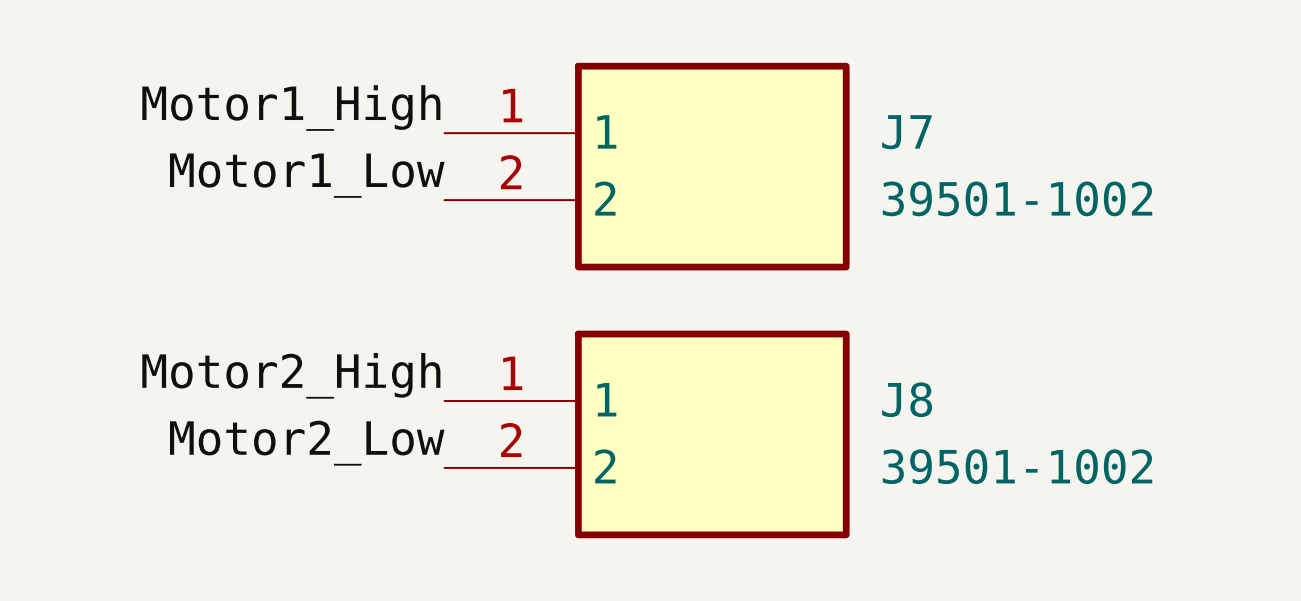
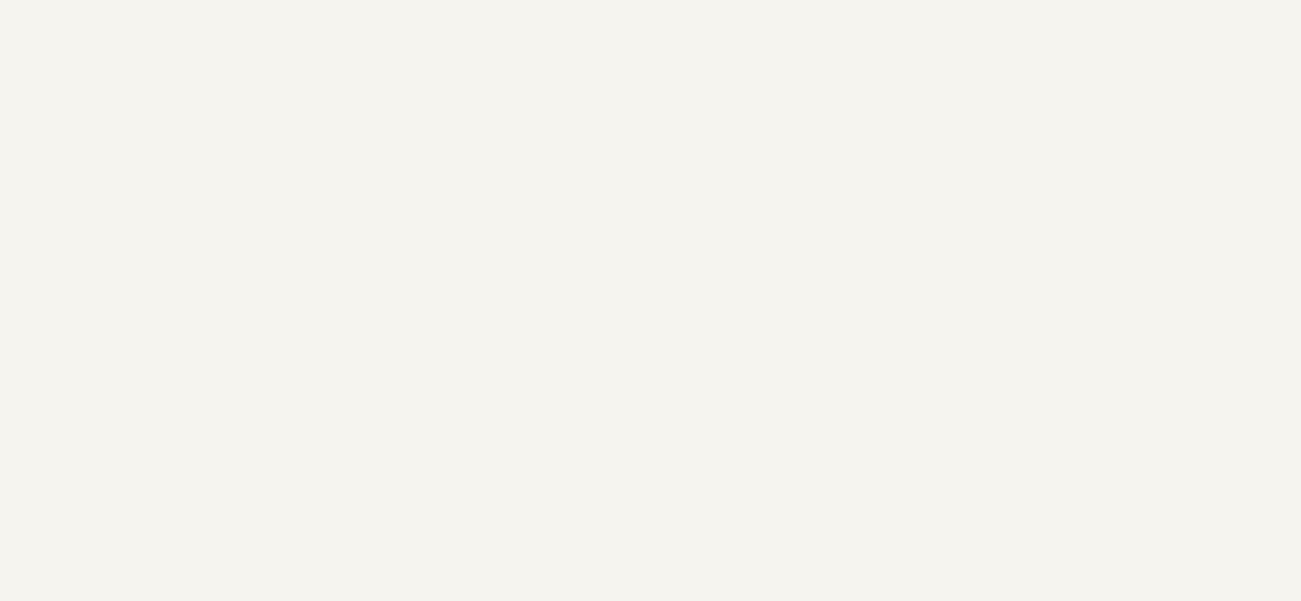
label: Motor1_High (291, 107) -> none
J7: 39501-1002 (647, 166) -> none
label: Motor1_Low (307, 175) -> none
label: Motor2_High (291, 375) -> none
J8: 39501-1002 (647, 434) -> none
label: Motor2_Low (307, 443) -> none

